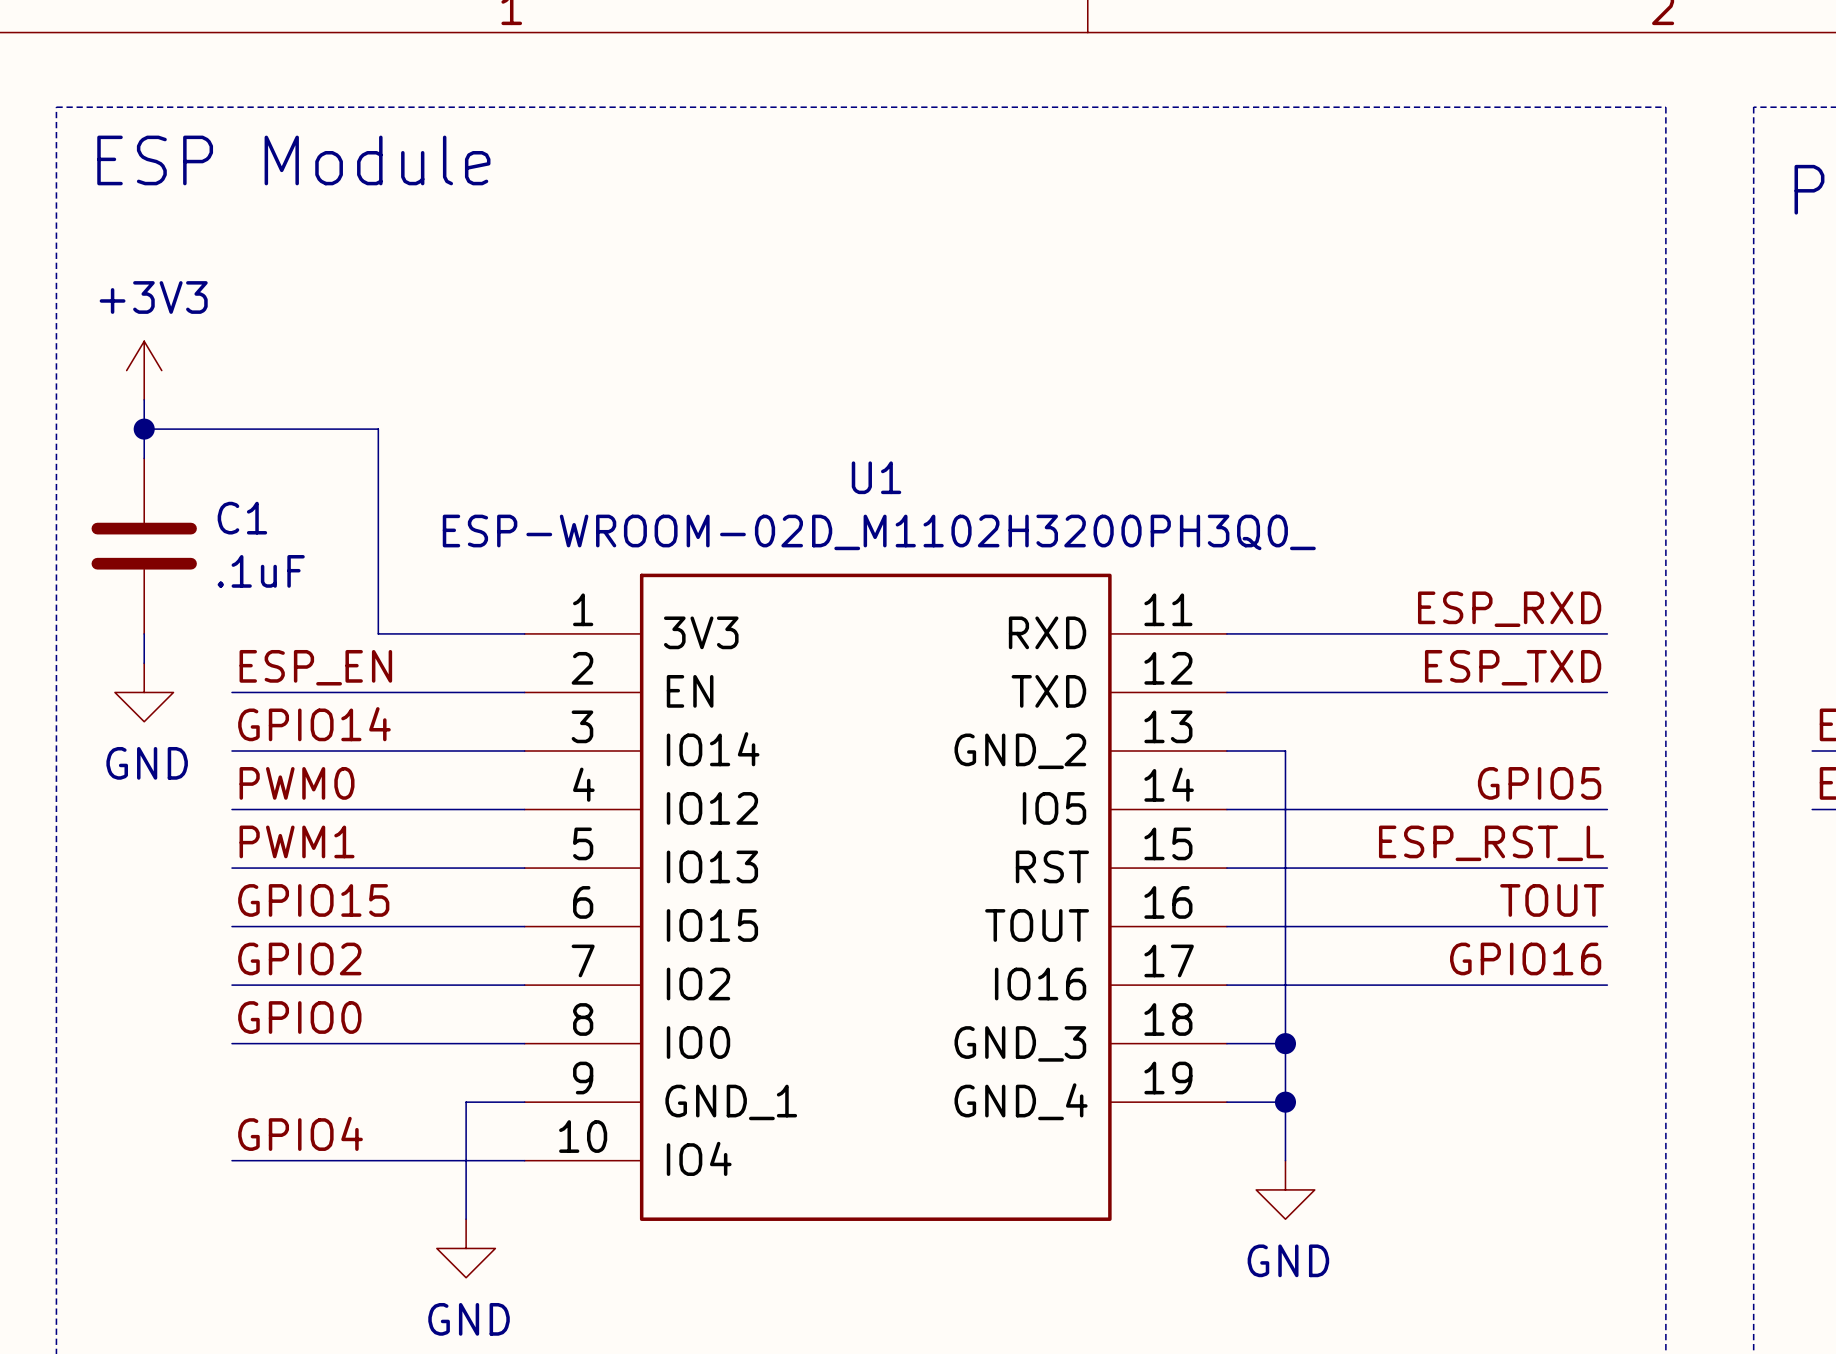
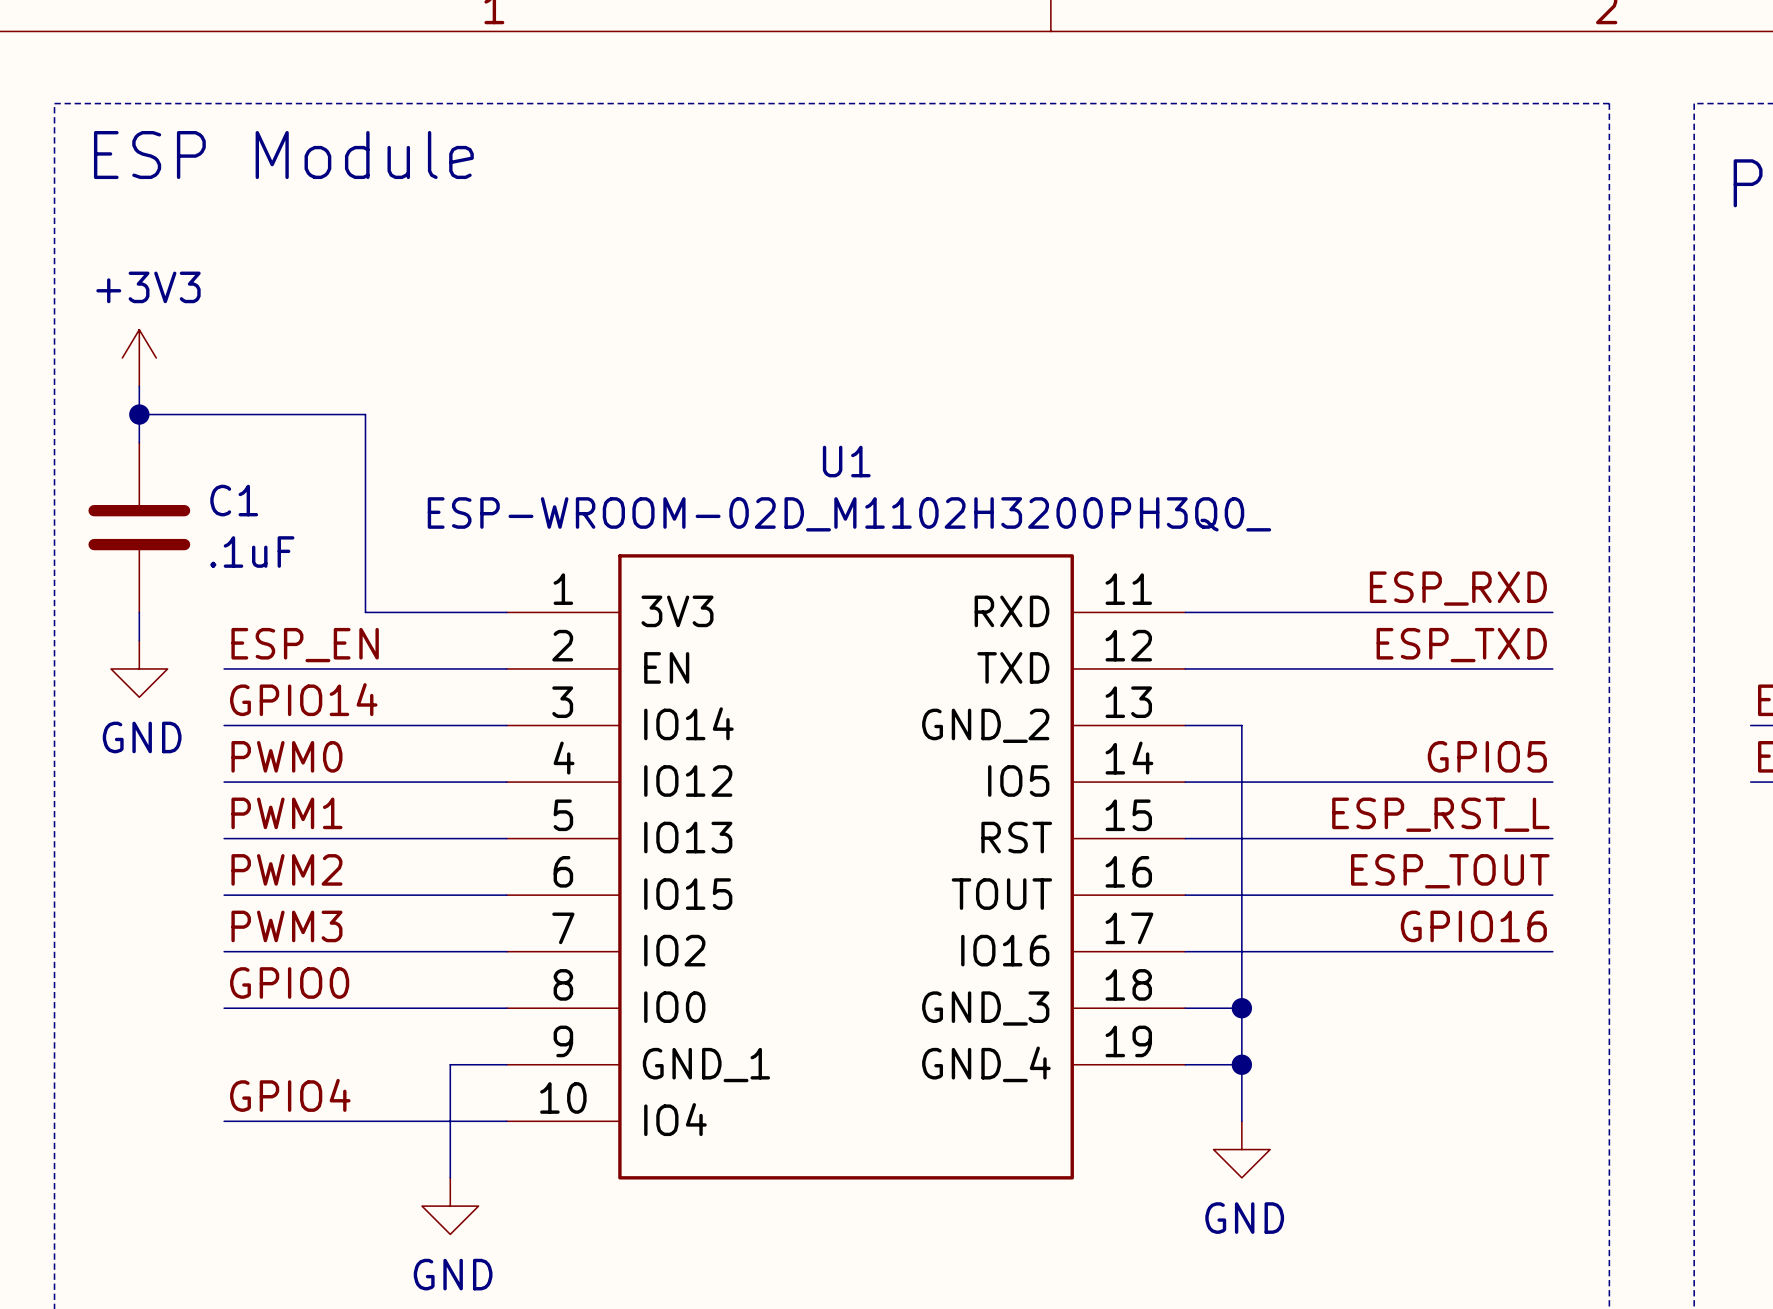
label: GPIO15 (313, 900) -> PWM2 (286, 869)
label: TOUT (1552, 900) -> ESP_TOUT (1450, 871)
label: GPIO2 (299, 958) -> PWM3 (286, 926)

